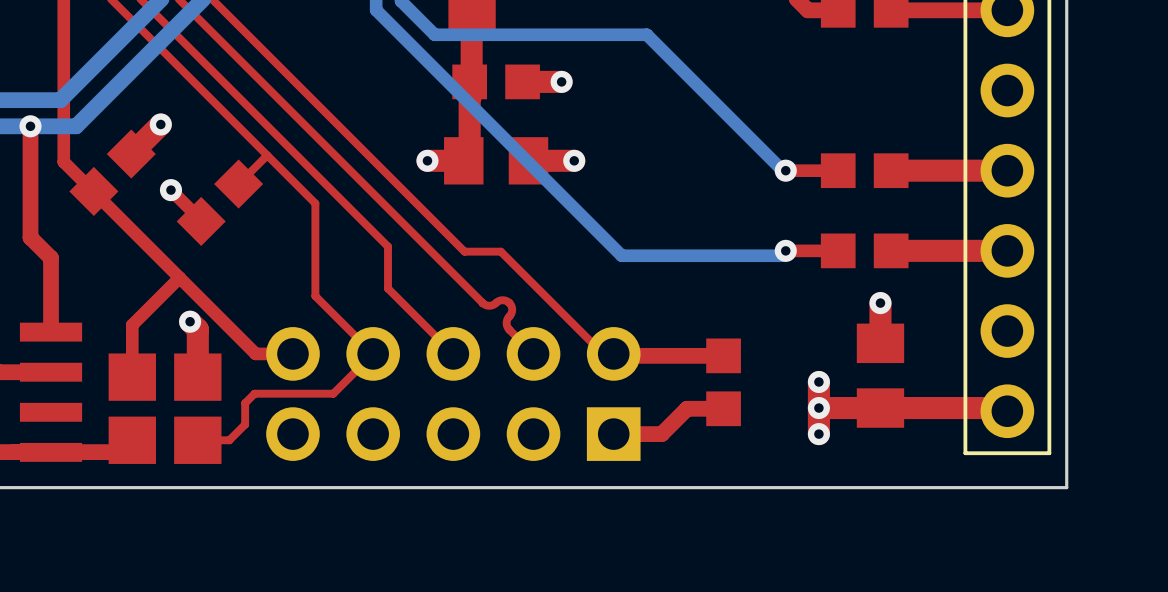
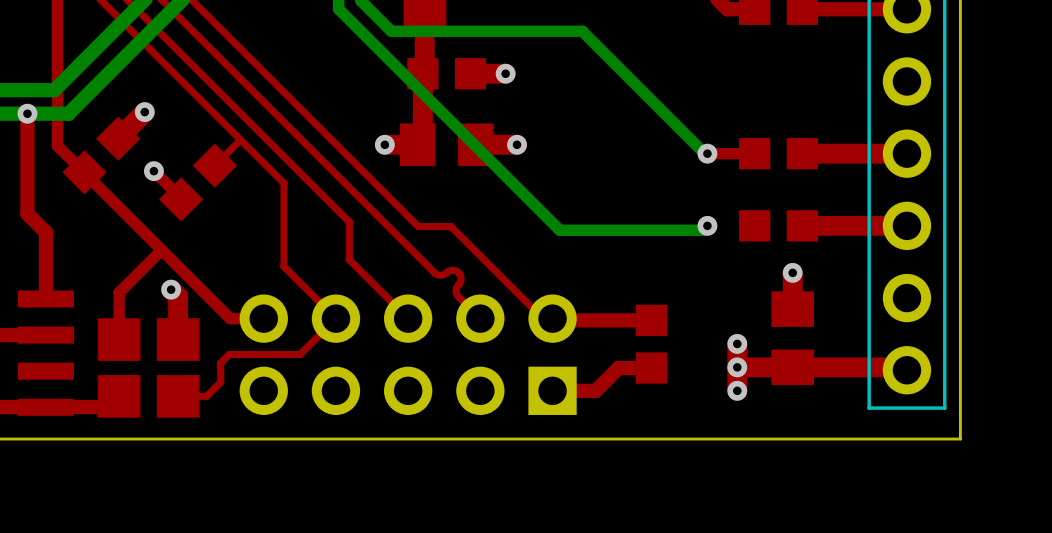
top track: (838, 250) (785, 250) -> none

